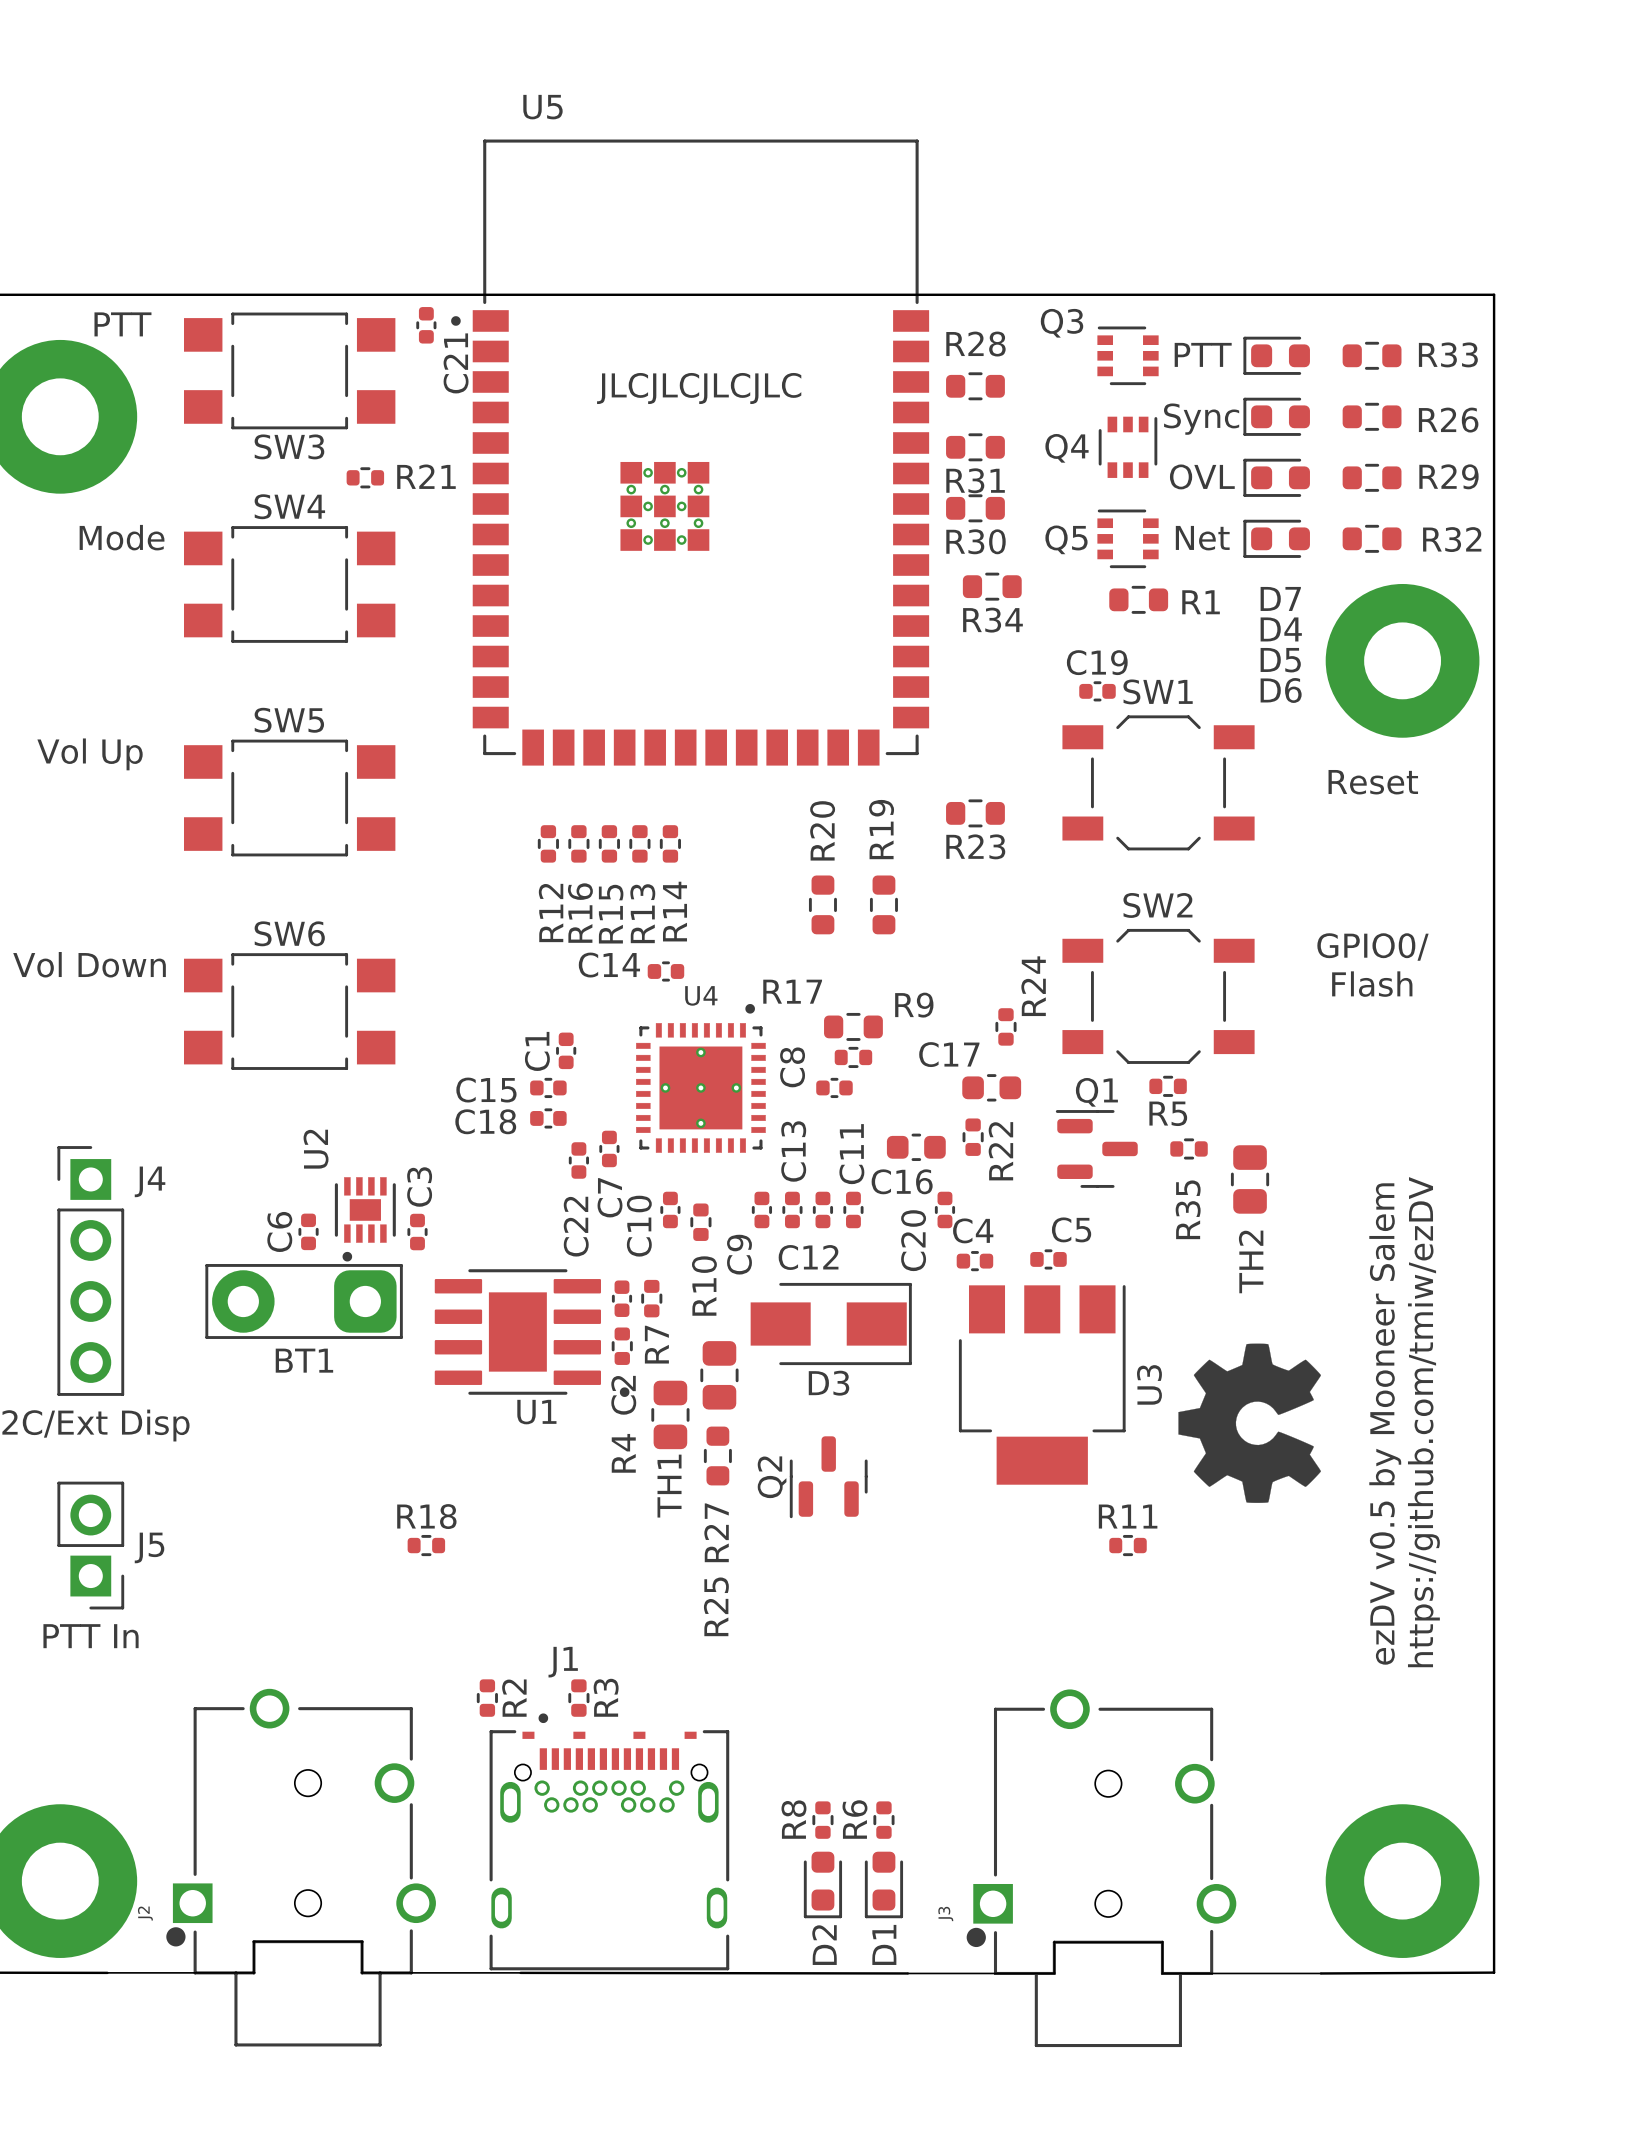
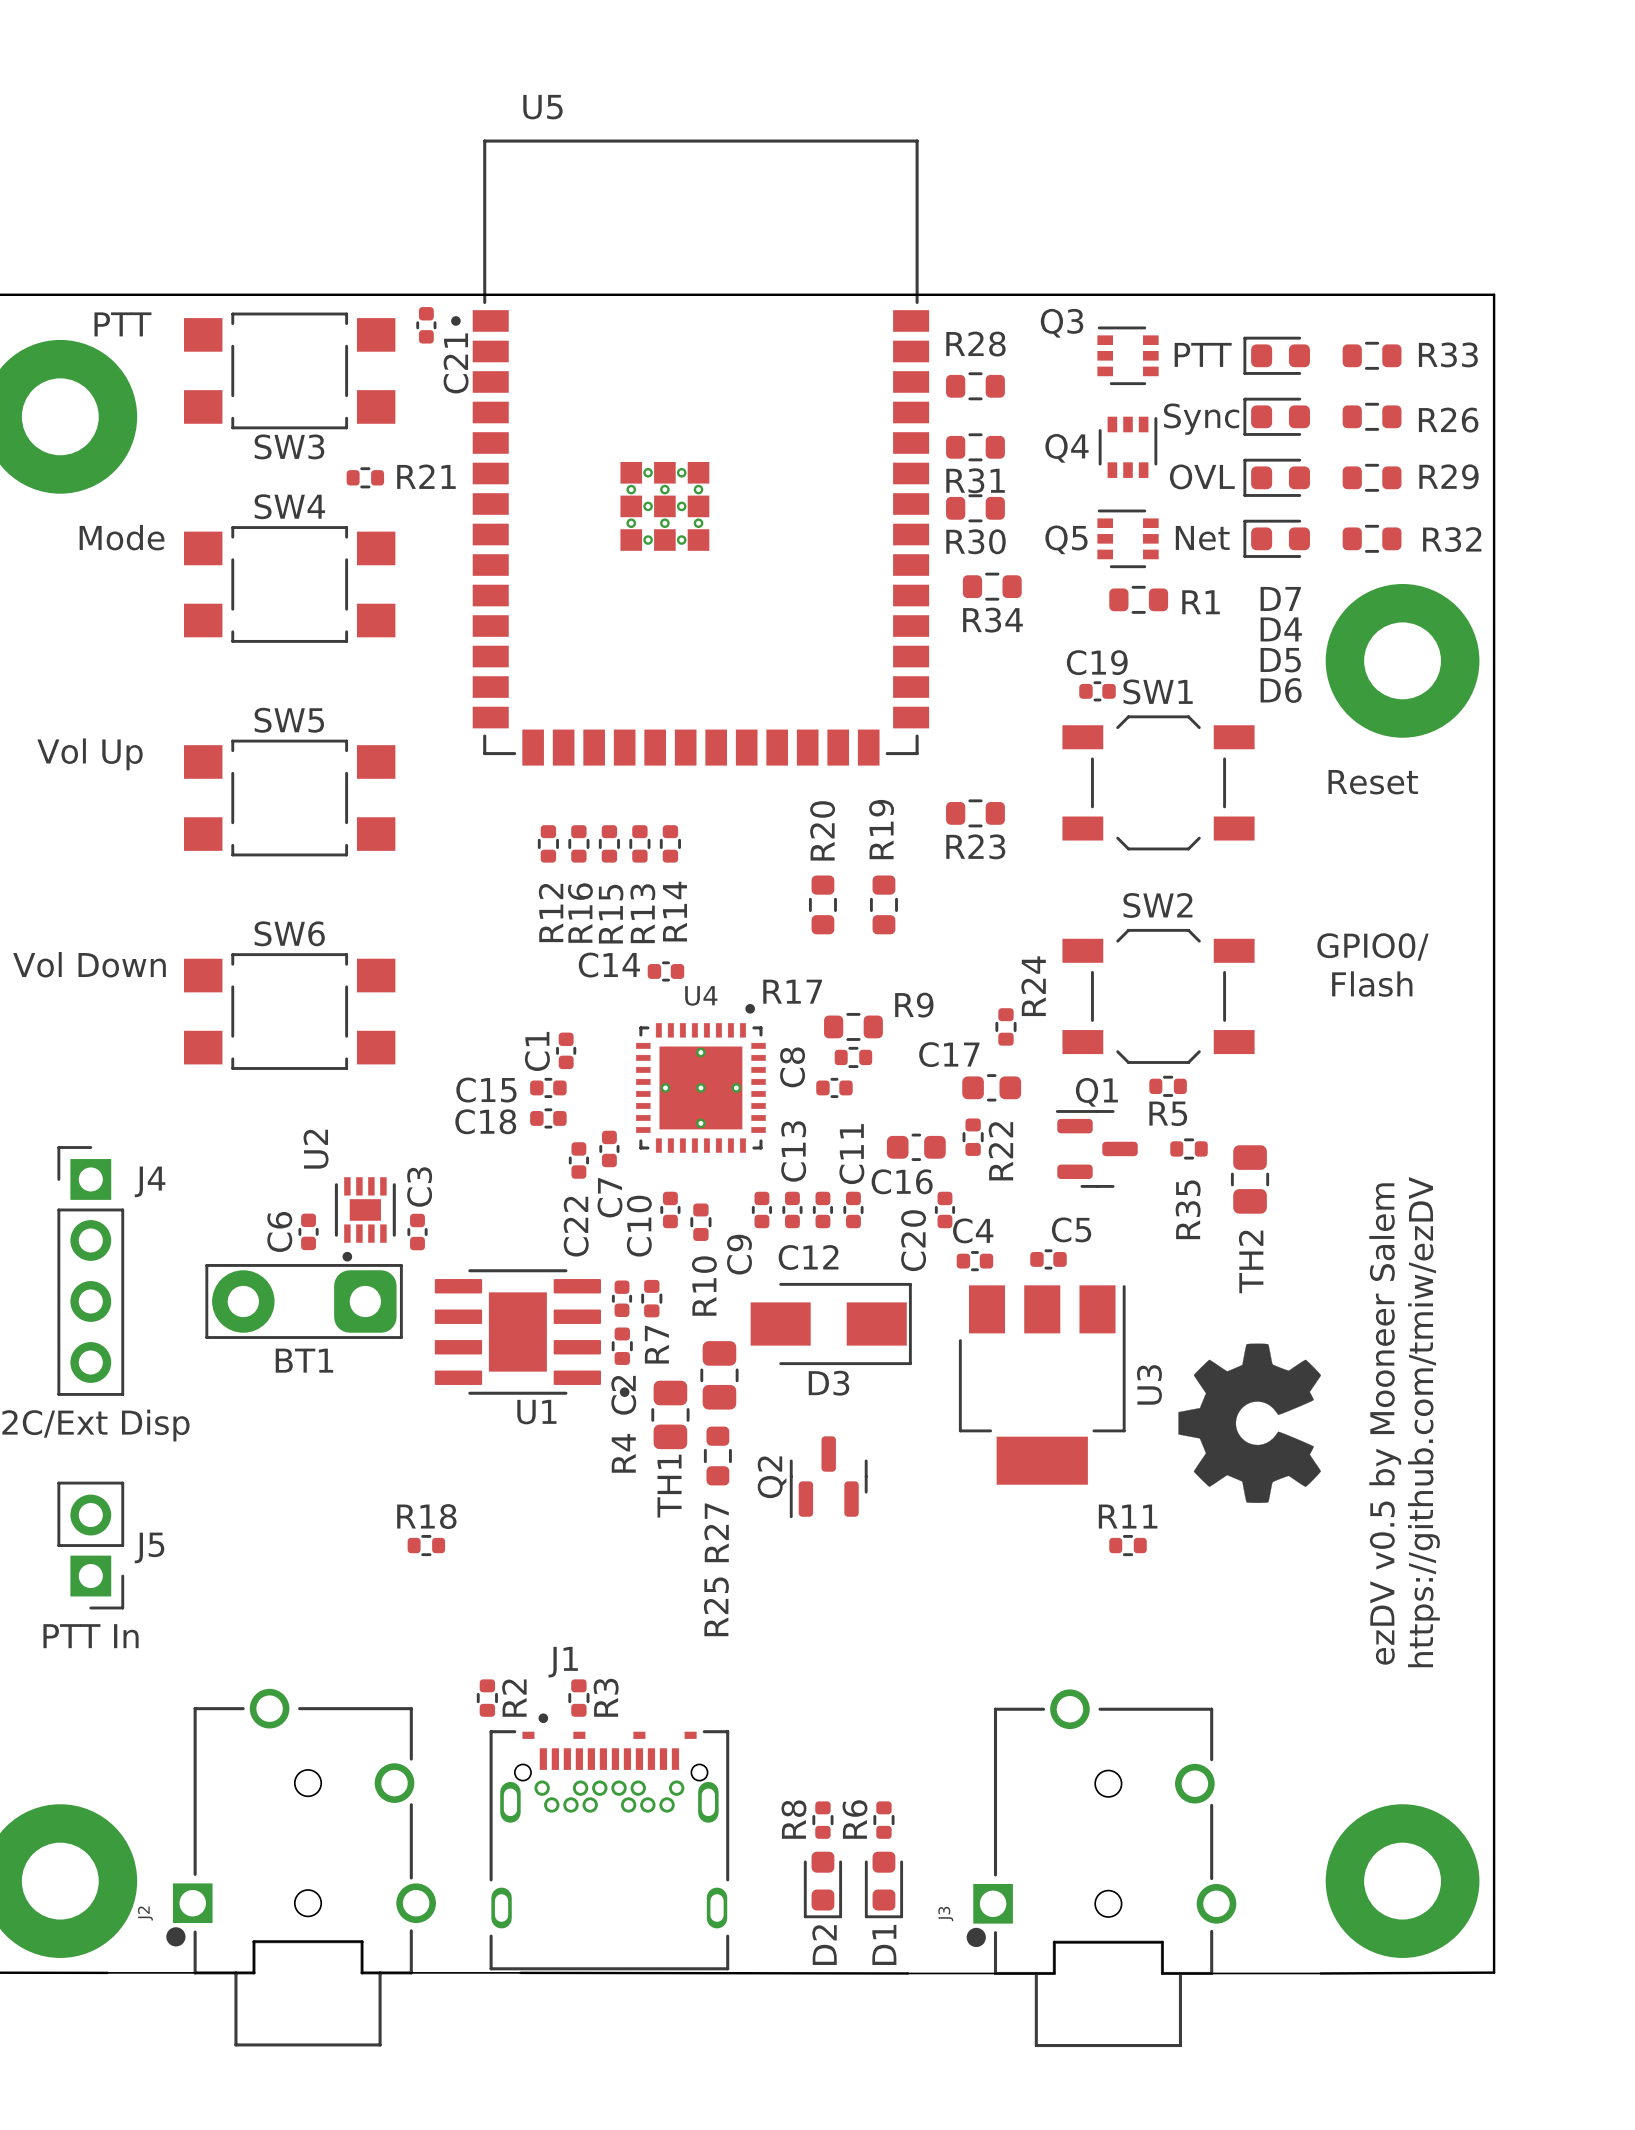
text: JLCJLCJLCJLC (699, 388) -> none

